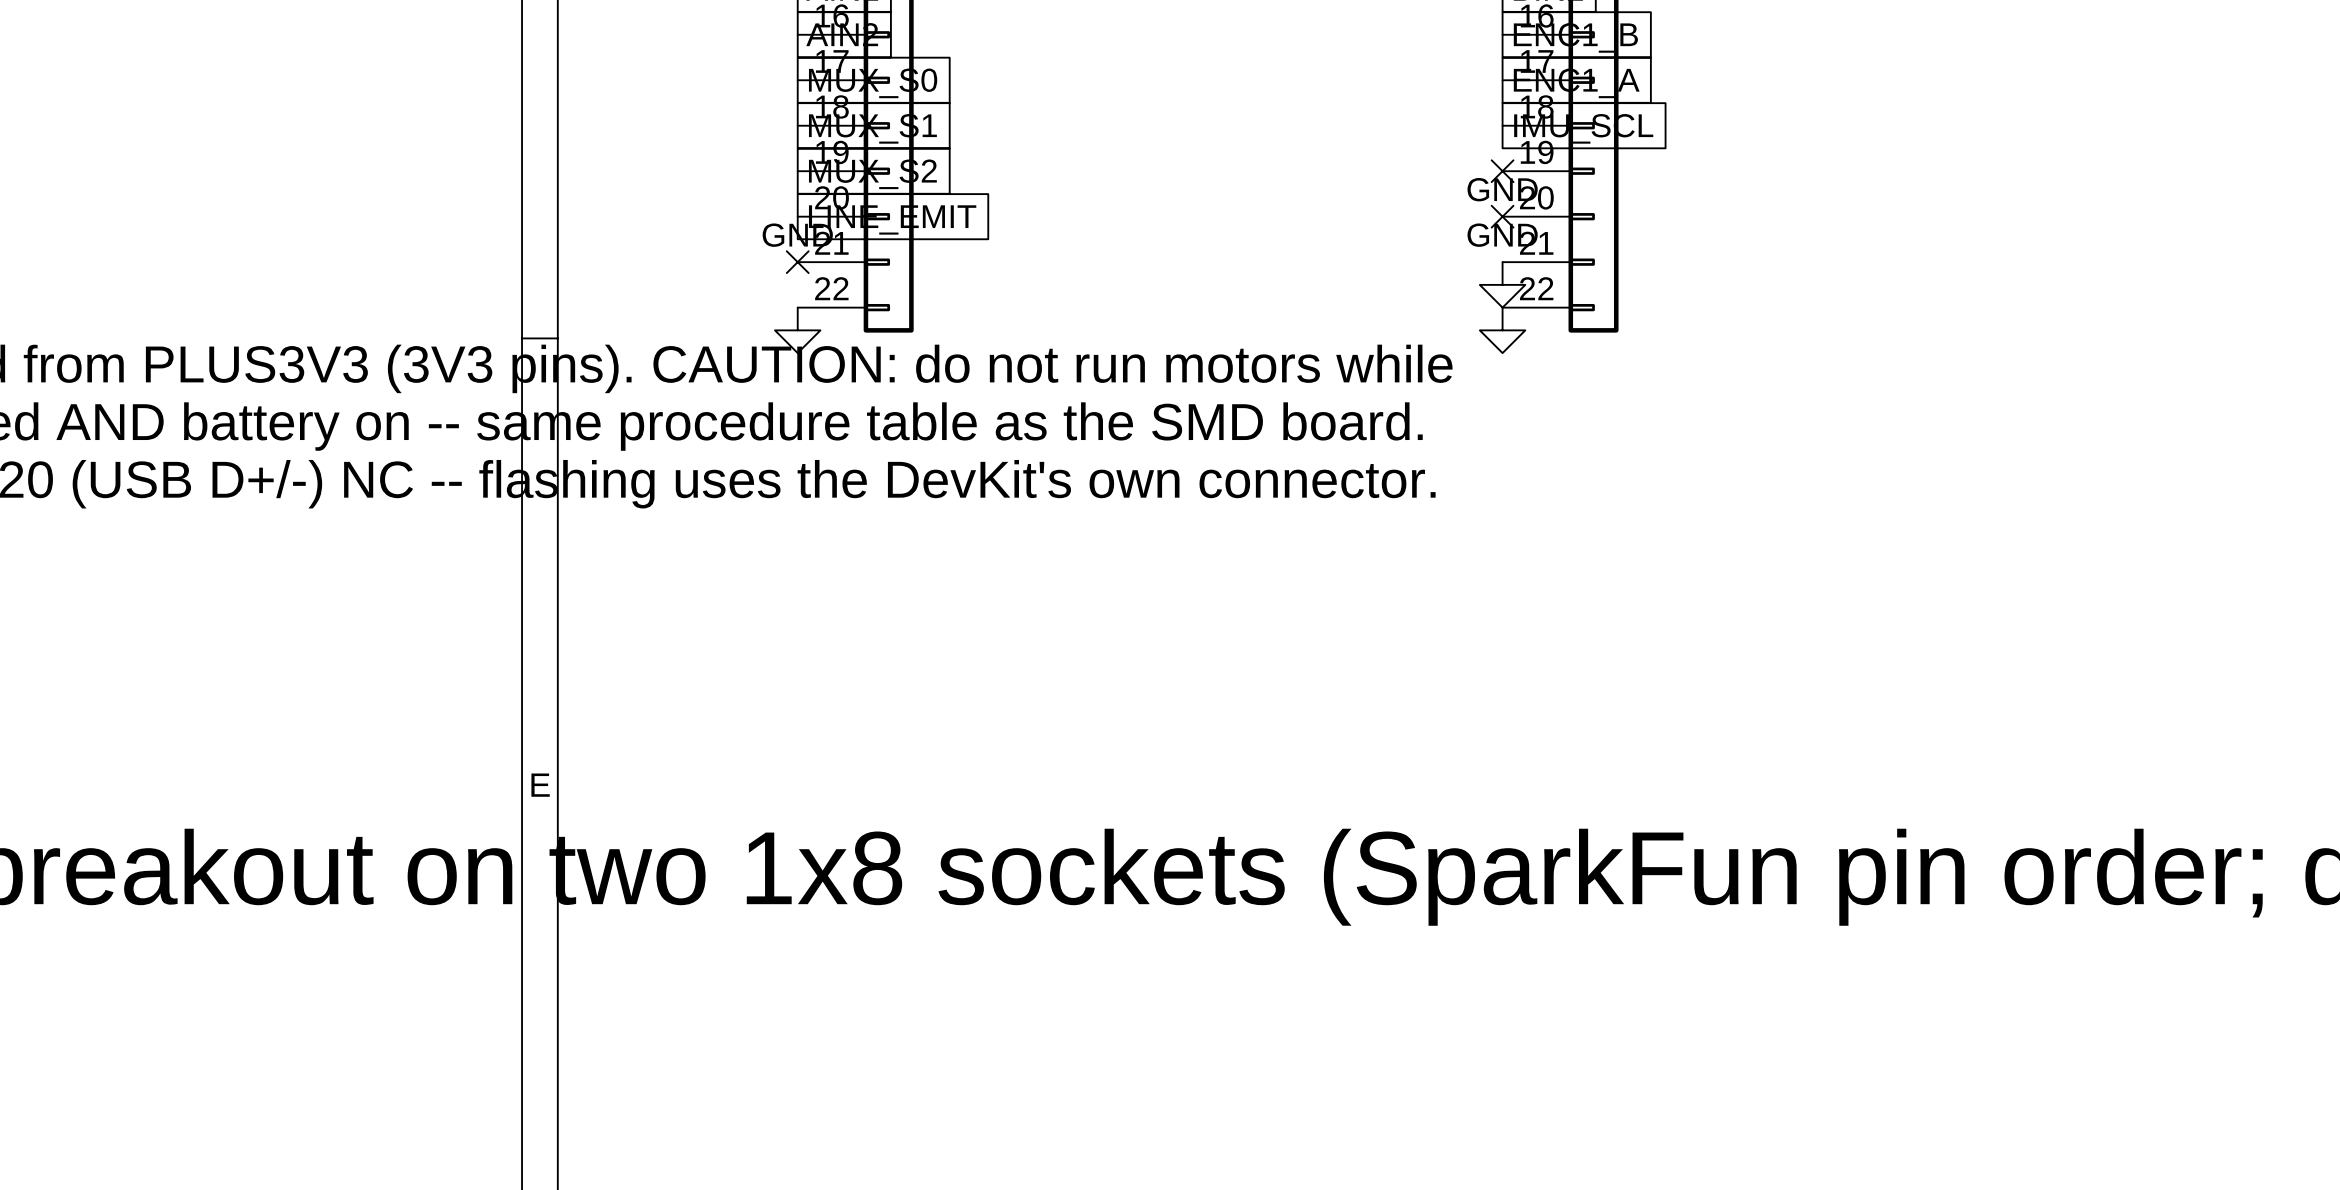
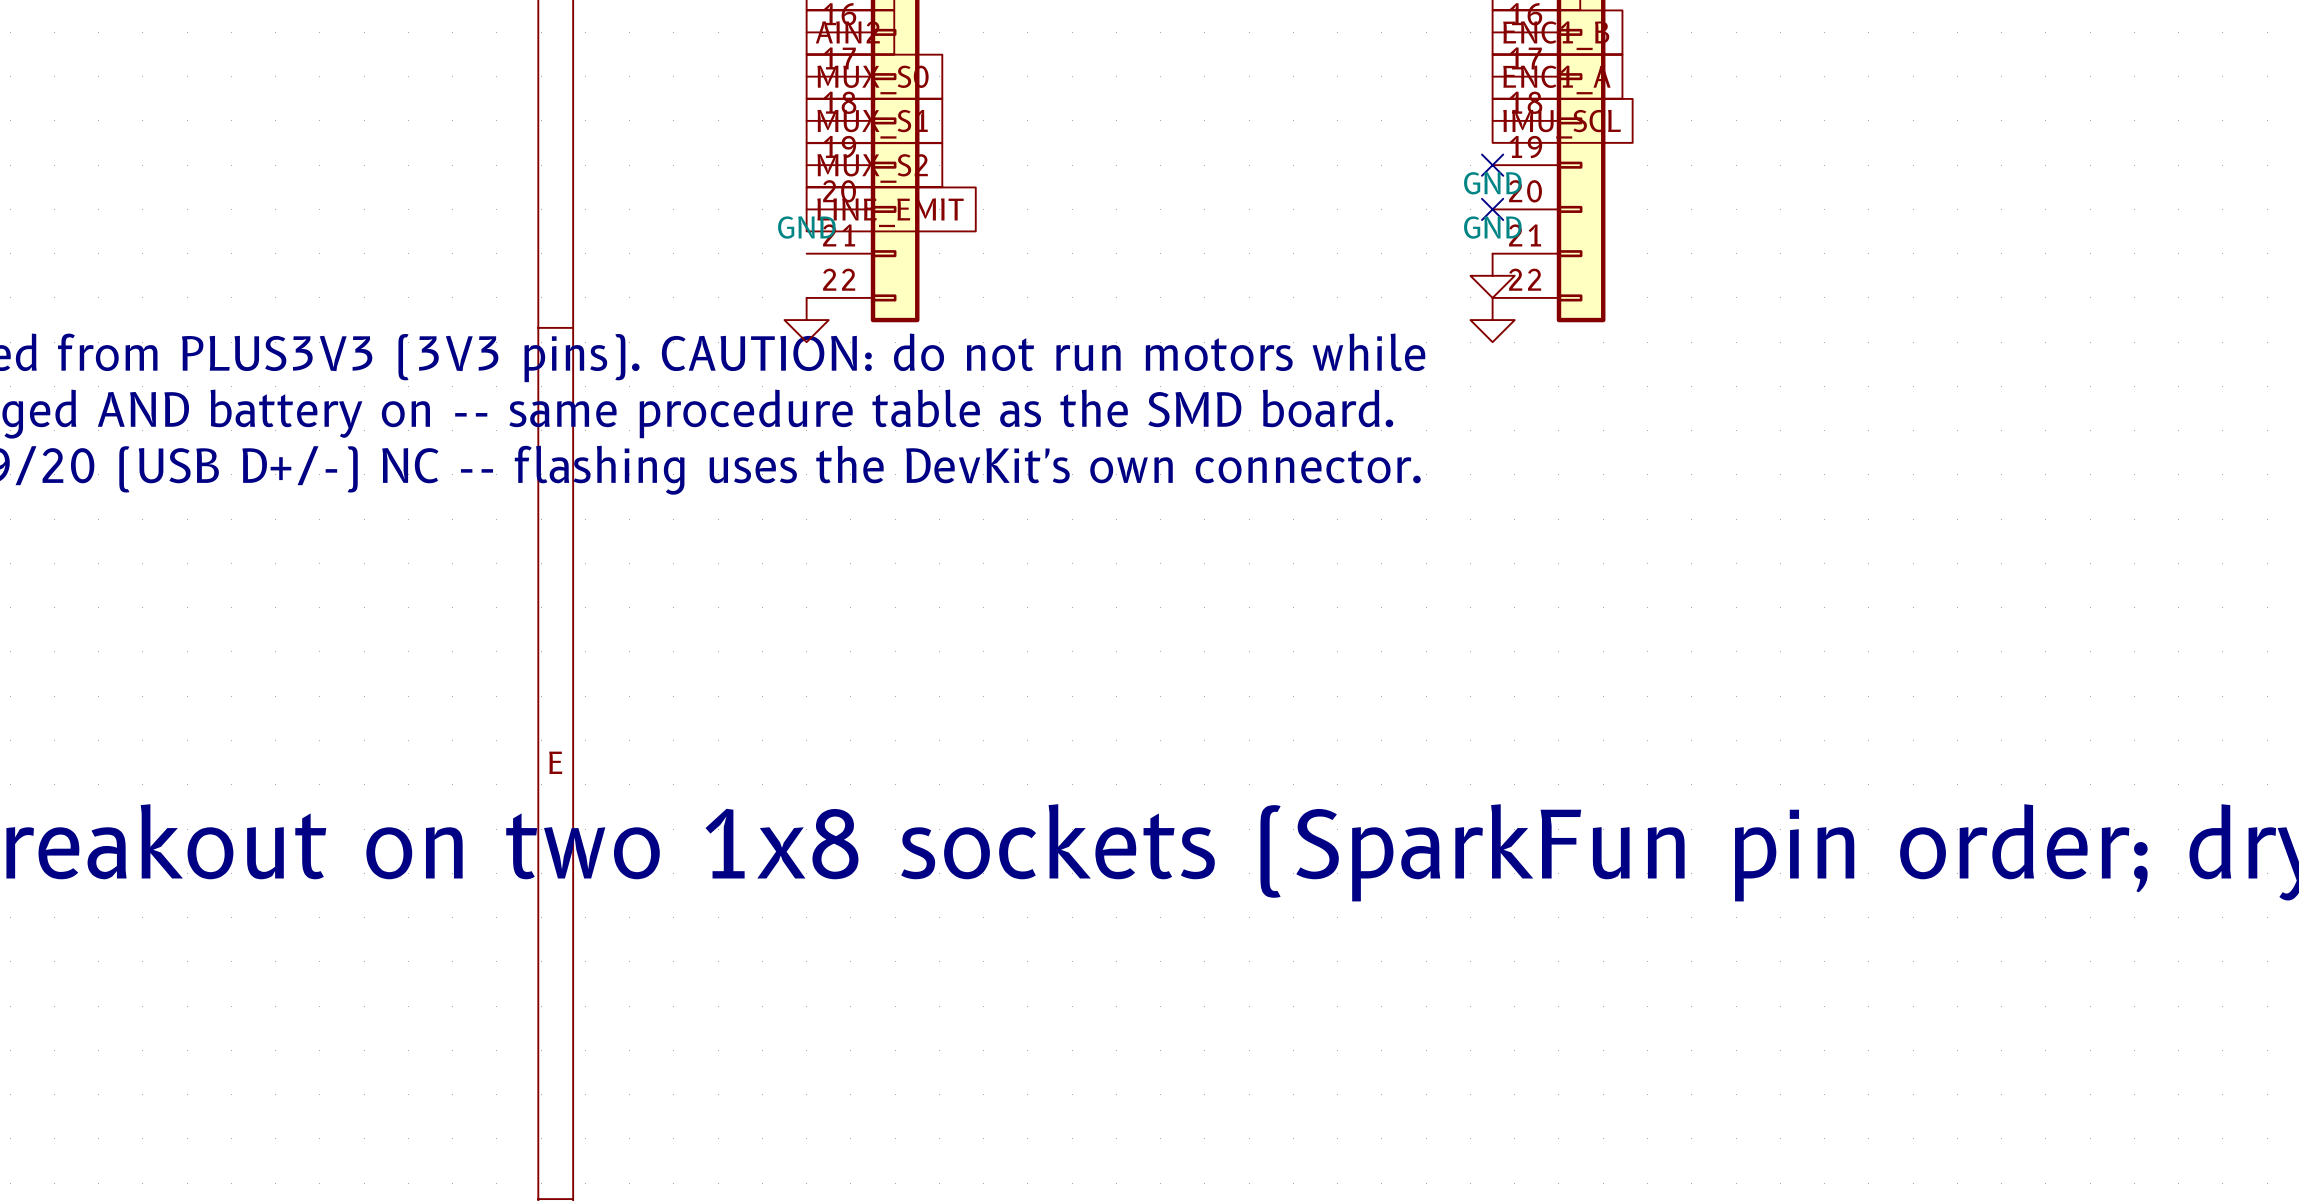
no-connect mark: (797, 262) -> none

